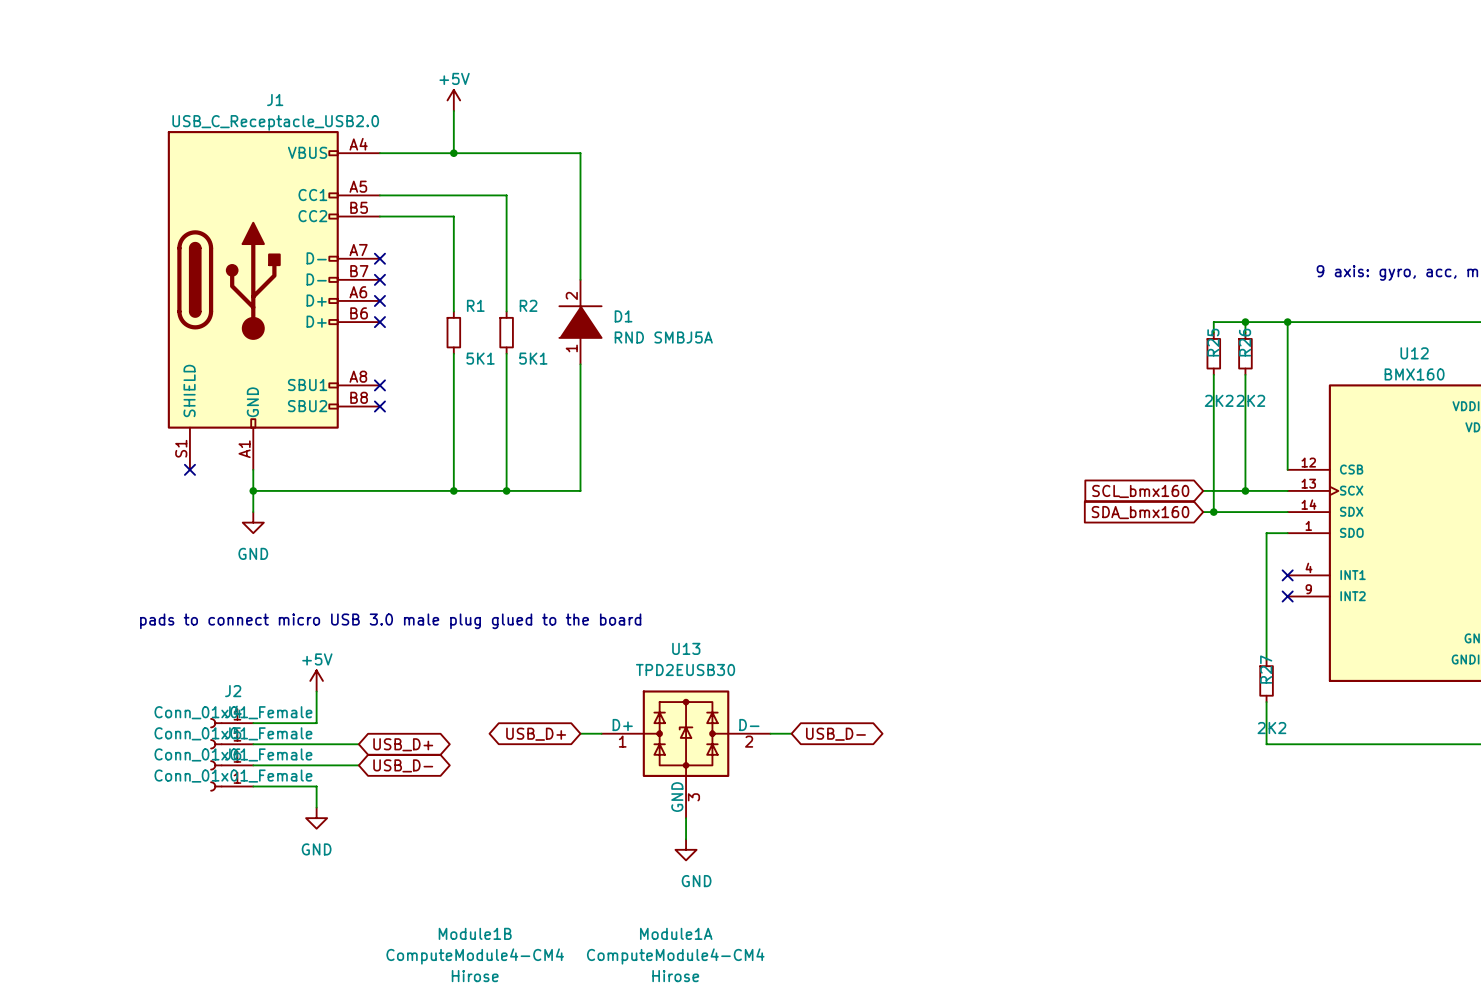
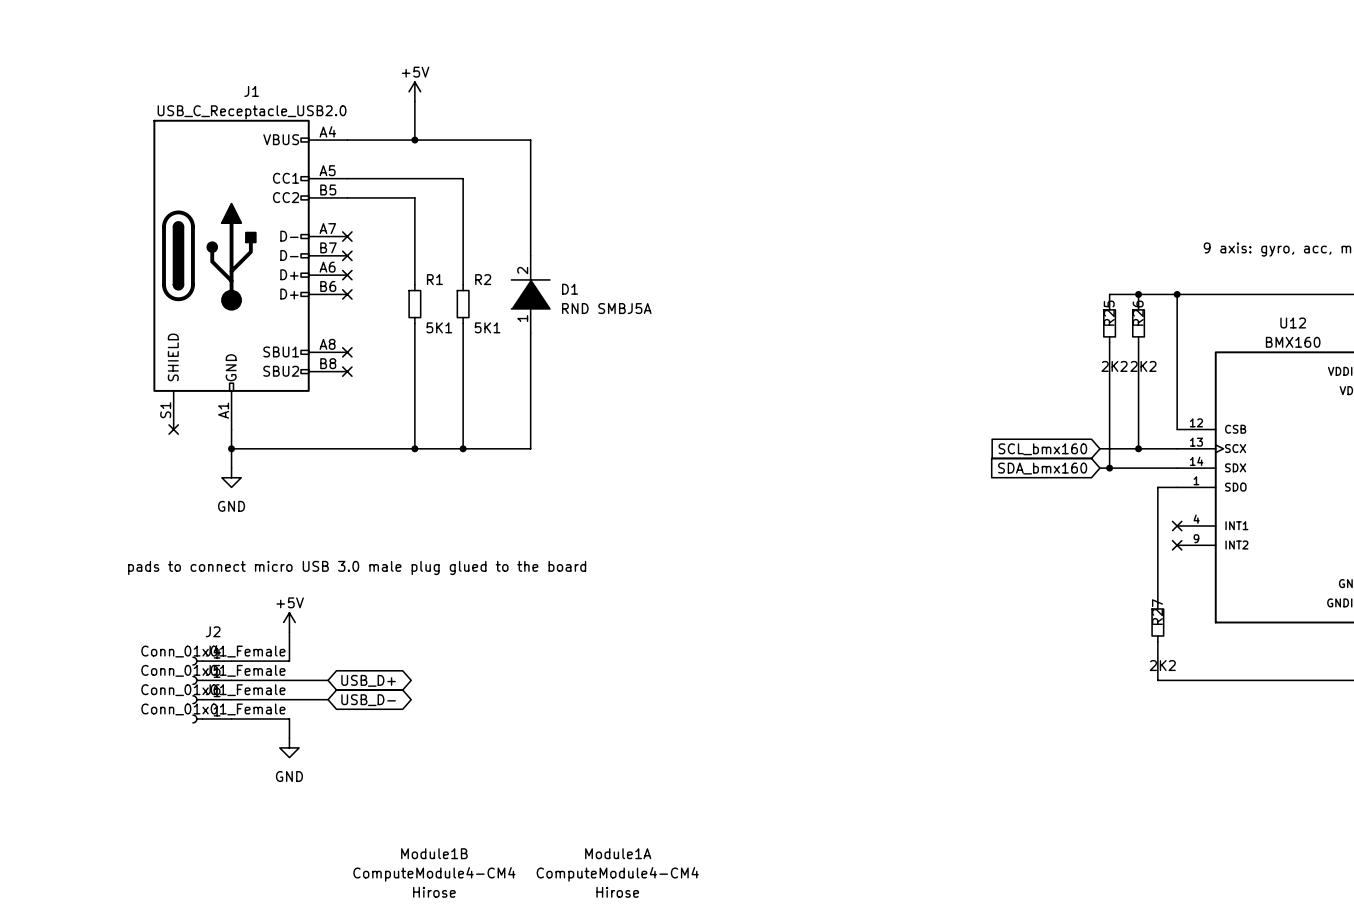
wire: (580, 733) (601, 733) -> none
wire: (770, 733) (791, 733) -> none
global label: USB_D+ (536, 734) -> none
global label: USB_D- (835, 734) -> none
U13: TPD2EUSB30 (686, 754) -> none
wire: (686, 818) (686, 839) -> none
power symbol: GND (686, 849) -> none

